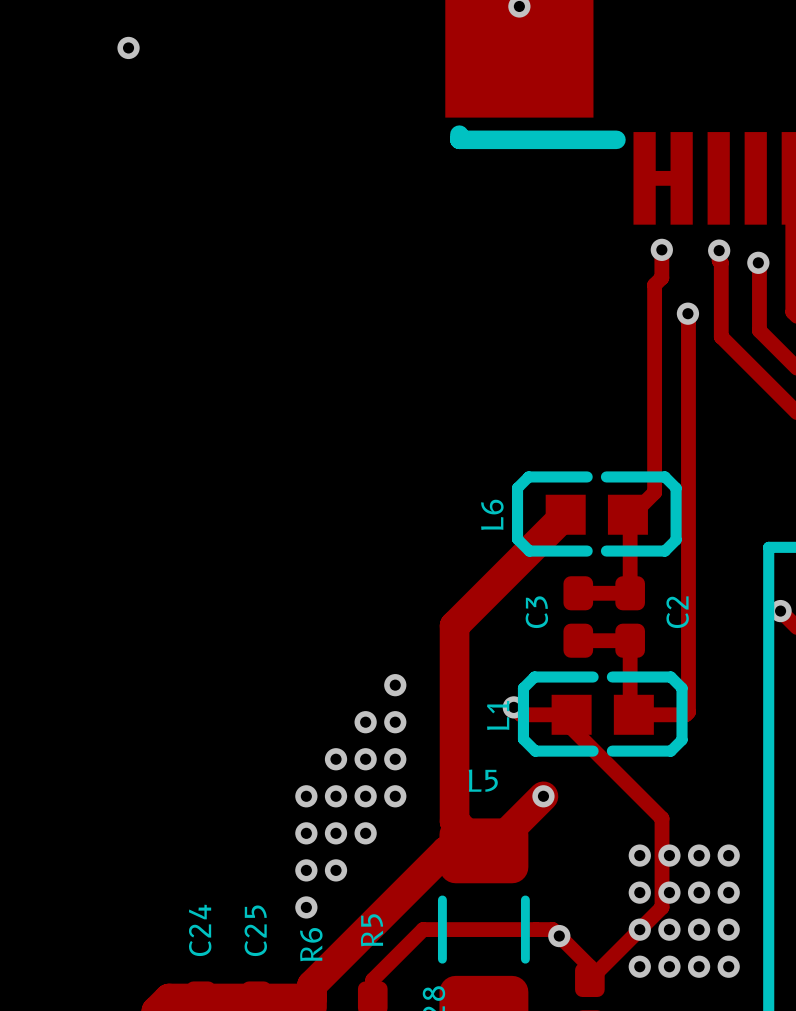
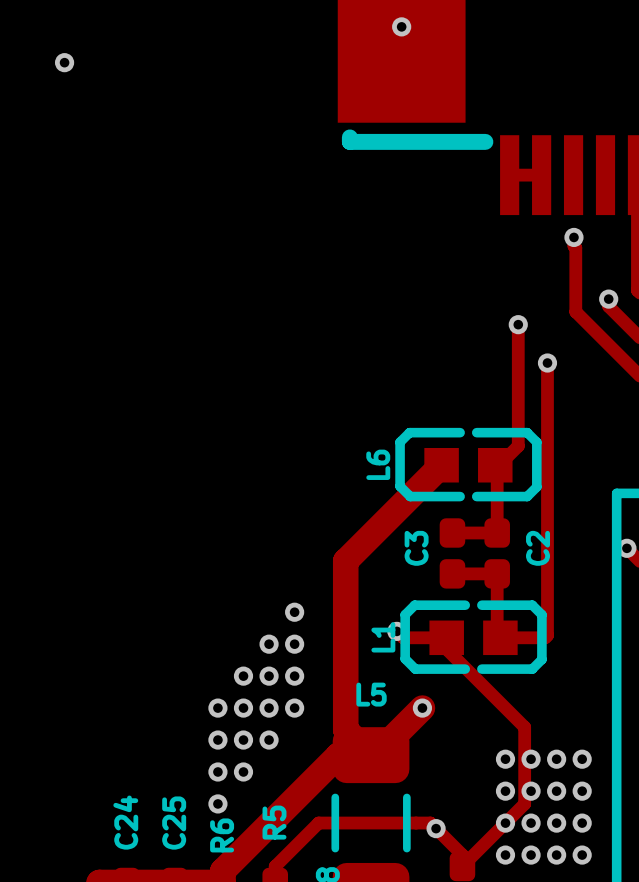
track: (661, 249) (661, 277) (654, 285) (654, 351) -> none
via: (661, 249) -> none
track: (758, 262) (759, 322) -> none
via: (758, 262) -> none
via: (687, 313) -> none
track: (688, 321) (688, 396) -> none
via: none -> (608, 299)
via: none -> (518, 324)
via: none -> (547, 363)

